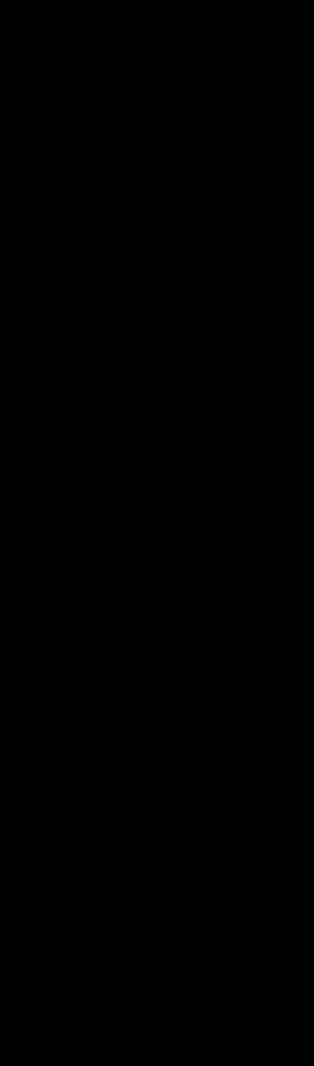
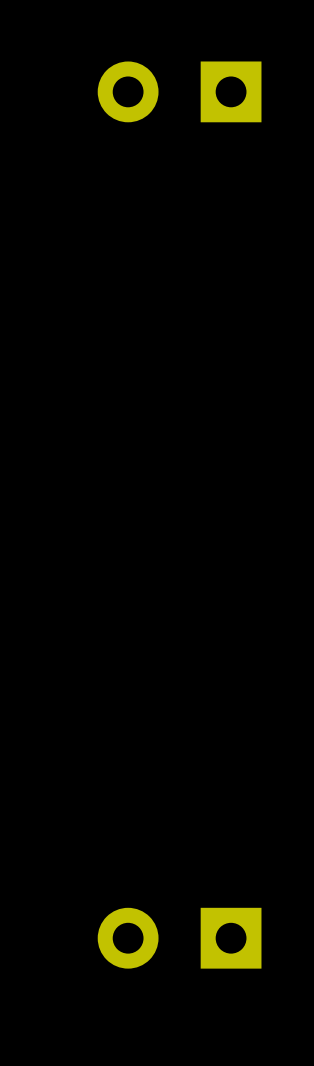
part: none -> (179, 91)
part: none -> (179, 938)

